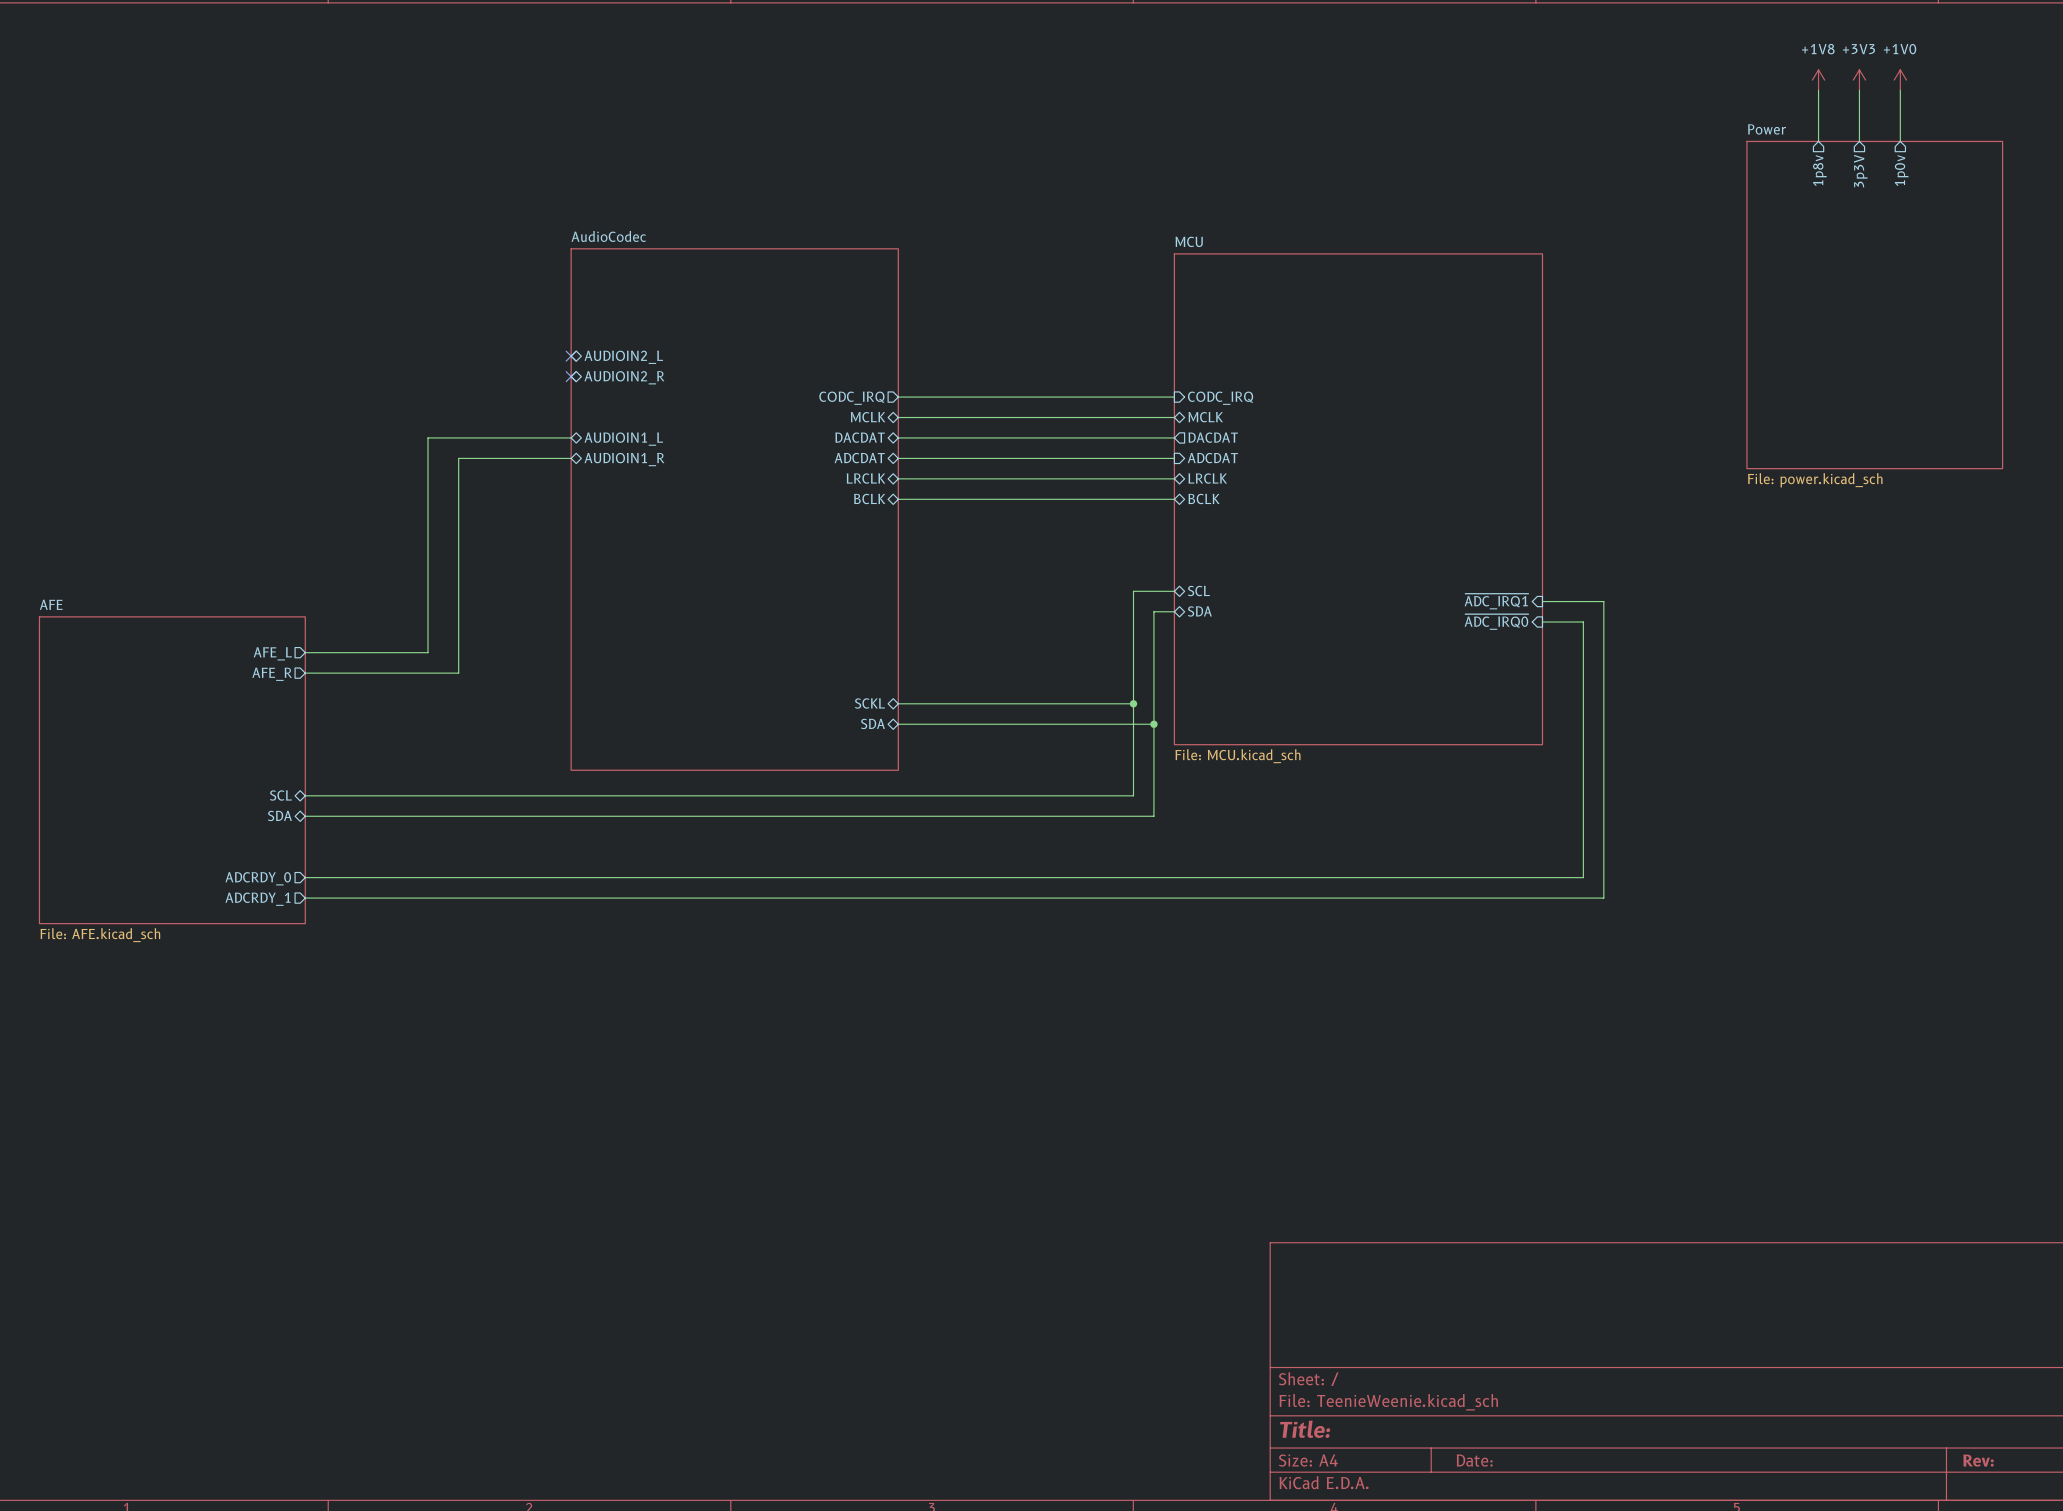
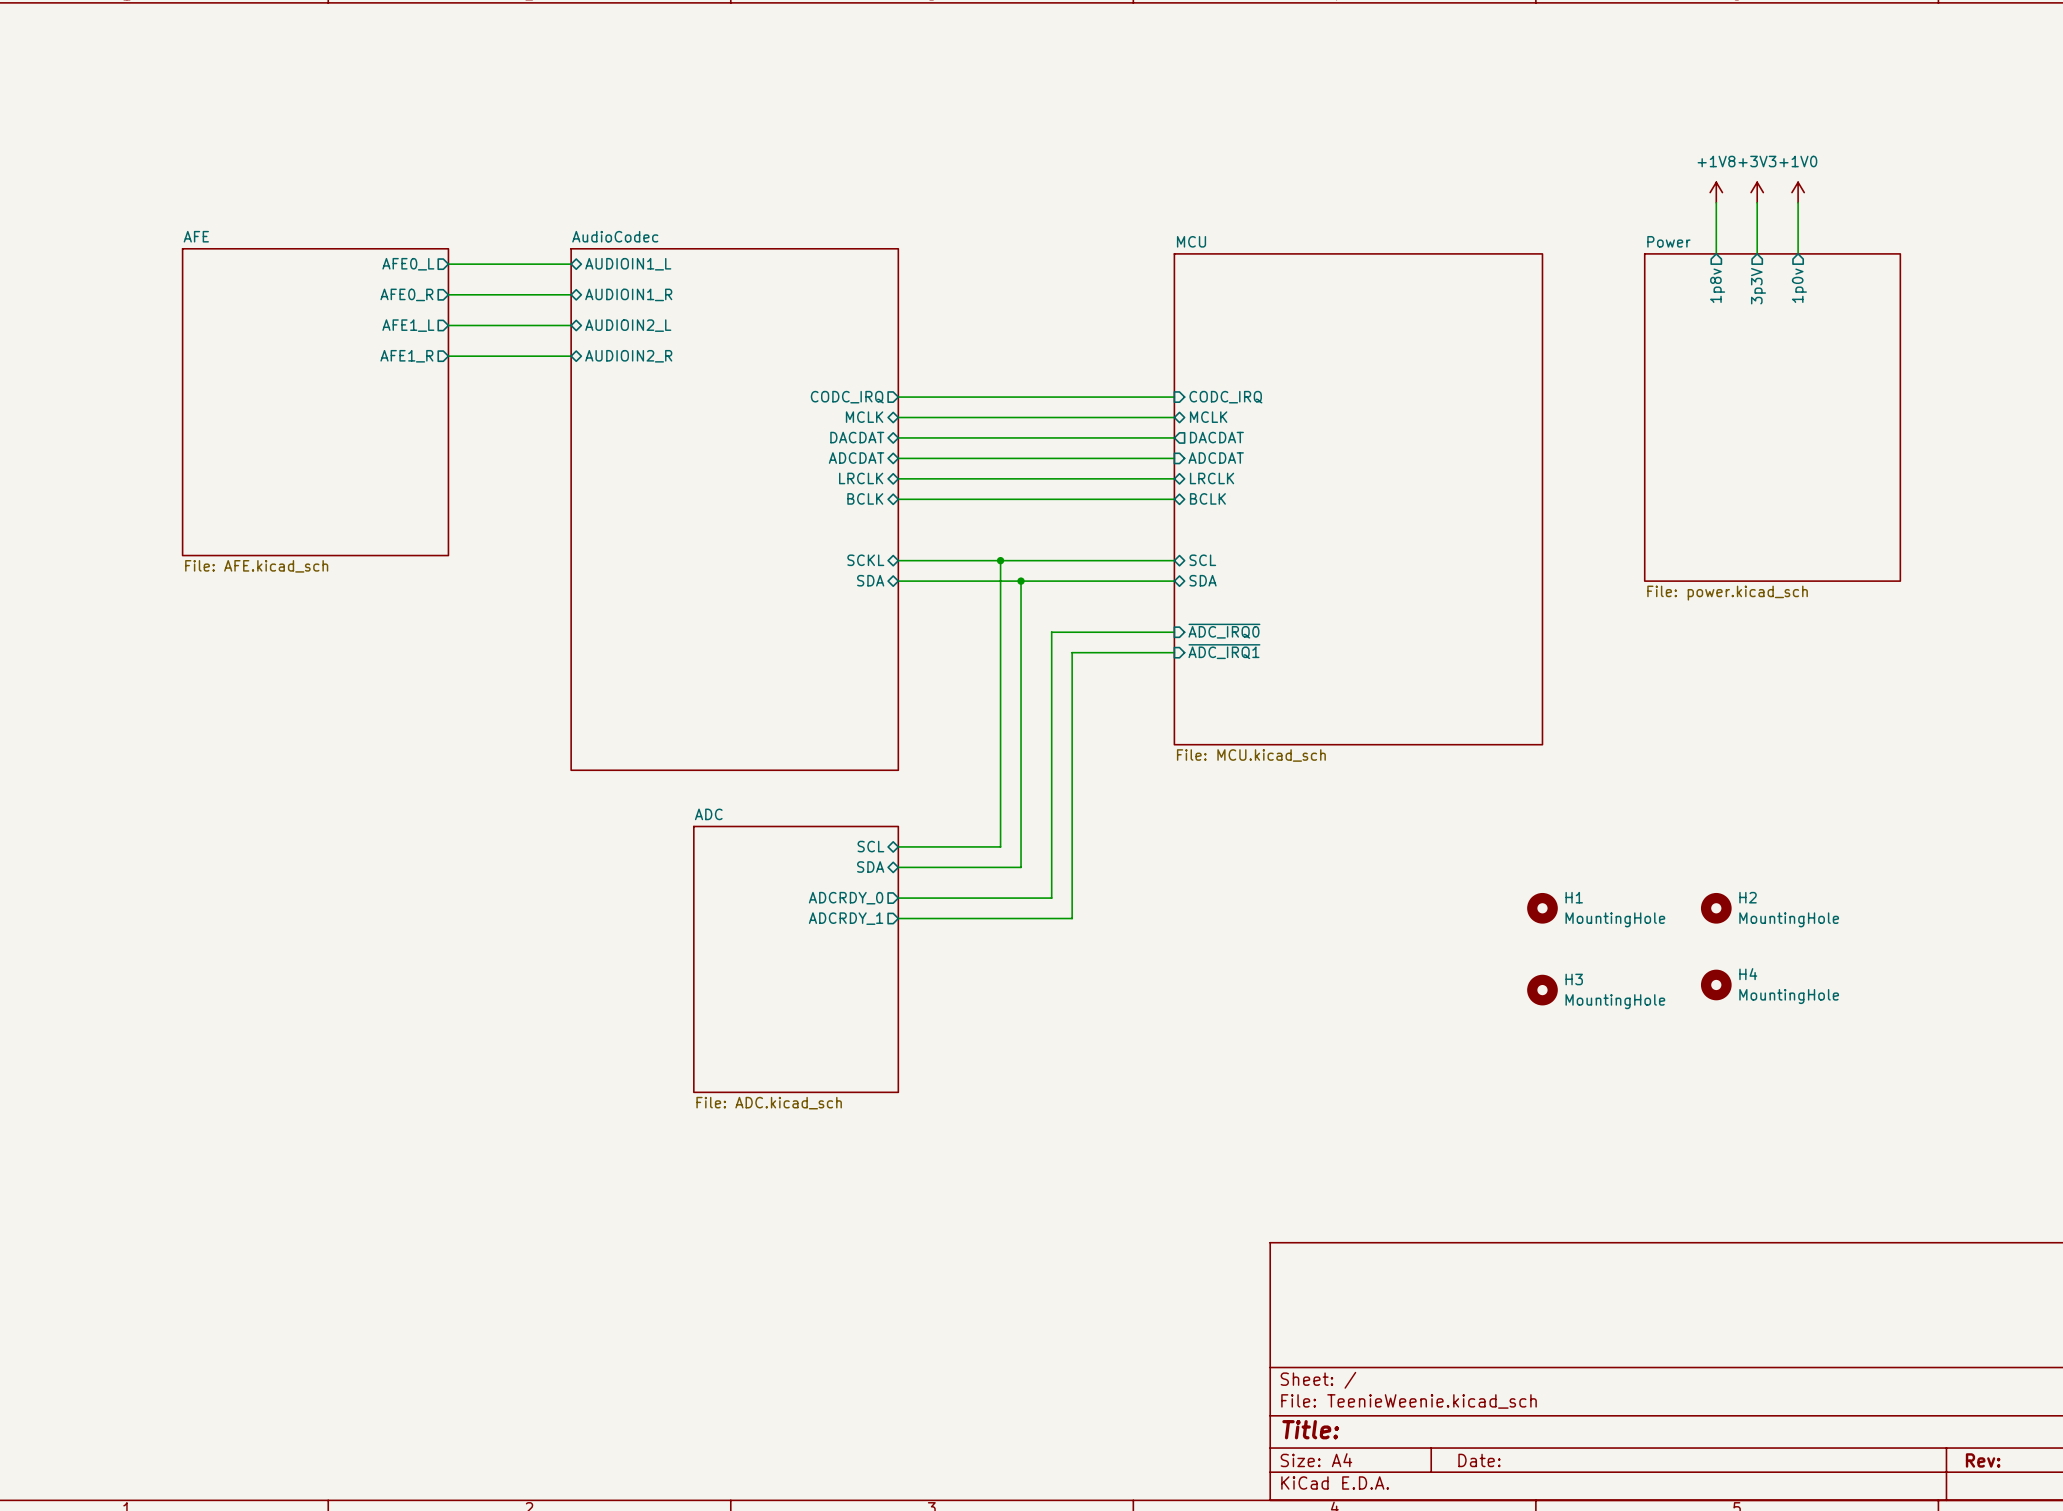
power symbol position: +1V8 (1818, 80) -> +1V8 (1716, 192)
power symbol position: +3V3 (1859, 80) -> +3V3 (1757, 192)
power symbol position: +1V0 (1900, 80) -> +1V0 (1798, 192)
wire: (1818, 90) (1818, 141) -> (1716, 202) (1716, 253)
wire: (1859, 90) (1859, 141) -> (1757, 202) (1757, 253)
wire: (1900, 90) (1900, 141) -> (1798, 202) (1798, 253)
sheet pin position: 1p8v (1819, 170) -> 1p8v (1717, 285)
sheet pin position: 1p0v (1901, 170) -> 1p0v (1799, 285)
sheet pin position: 3p3V (1860, 171) -> 3p3V (1758, 286)
wire: none -> (448, 264) (571, 264)
sheet pin: none -> AFE0_L (408, 264)
wire: none -> (448, 294) (571, 294)
sheet pin: none -> AFE0_R (406, 294)
sheet Power position: (1874, 305) -> (1772, 417)
wire: none -> (448, 325) (571, 325)
sheet pin: none -> AFE1_L (408, 325)
sheet pin: none -> AUDIOIN2_L (628, 325)
wire: none -> (448, 356) (571, 356)
no-connect mark: (571, 356) -> none
sheet pin: none -> AFE1_R (406, 356)
sheet pin: AUDIOIN2_L (623, 357) -> AUDIOIN2_R (628, 356)
no-connect mark: (571, 376) -> none
sheet pin: AUDIOIN2_R (624, 377) -> none
sheet AFE: none -> File: AFE.kicad_sch (315, 402)
wire: (571, 437) (427, 437) (427, 652) (305, 652) -> none
sheet pin position: AUDIOIN1_L (623, 439) -> AUDIOIN1_L (628, 264)
wire: (571, 458) (458, 458) (458, 673) (305, 673) -> none
sheet pin position: AUDIOIN1_R (624, 459) -> AUDIOIN1_R (628, 294)
wire: none -> (898, 560) (1174, 560)
wire: none -> (1000, 560) (1000, 846) (898, 846)
junction: none -> (1000, 560)
sheet pin: none -> SDA (870, 580)
wire: none -> (898, 581) (1174, 581)
wire: none -> (1021, 581) (1021, 867) (898, 867)
junction: none -> (1021, 581)
wire: (1174, 591) (1133, 591) (1133, 795) (305, 795) -> none
sheet pin position: SCL (1198, 591) -> SCL (1202, 560)
sheet pin: ~{ADC_IRQ1} (1496, 601) -> none
wire: (1542, 601) (1603, 601) (1603, 898) (1051, 898) -> (1174, 632) (1051, 632) (1051, 898)
wire: (1174, 611) (1153, 611) (1153, 816) (305, 816) -> none
sheet pin position: SDA (1199, 611) -> SDA (1203, 580)
sheet pin: ~{ADC_IRQ0} (1496, 621) -> none
wire: (1542, 622) (1583, 622) (1583, 877) (305, 877) -> none
sheet pin: none -> ~{ADC_IRQ0} (1224, 631)
wire: none -> (1174, 652) (1072, 652) (1072, 918) (898, 918)
sheet pin: none -> ~{ADC_IRQ1} (1224, 651)
sheet pin: AFE_L (272, 653) -> none
sheet pin: AFE_R (272, 674) -> none
sheet pin position: SCKL (869, 703) -> SCKL (865, 560)
wire: (898, 703) (1133, 703) -> none
junction: (1133, 703) -> none
sheet pin: SDA (872, 723) -> none
wire: (898, 724) (1153, 724) -> none
junction: (1153, 724) -> none
sheet AFE: File: AFE.kicad_sch (172, 770) -> none
sheet pin: SCL (280, 795) -> none
sheet pin: SDA (279, 815) -> none
sheet pin: none -> SCL (870, 846)
sheet pin: none -> SDA (870, 867)
sheet pin: ADCRDY_0 (258, 878) -> none
wire: (305, 898) (898, 898) -> none
sheet pin: ADCRDY_1 (258, 899) -> none
sheet pin: none -> ADCRDY_0 (846, 898)
H1: none -> MountingHole (1542, 908)
H2: none -> MountingHole (1716, 908)
sheet pin: none -> ADCRDY_1 (846, 918)
sheet ADC: none -> File: ADC.kicad_sch (796, 959)
H4: none -> MountingHole (1716, 984)
H3: none -> MountingHole (1542, 990)

